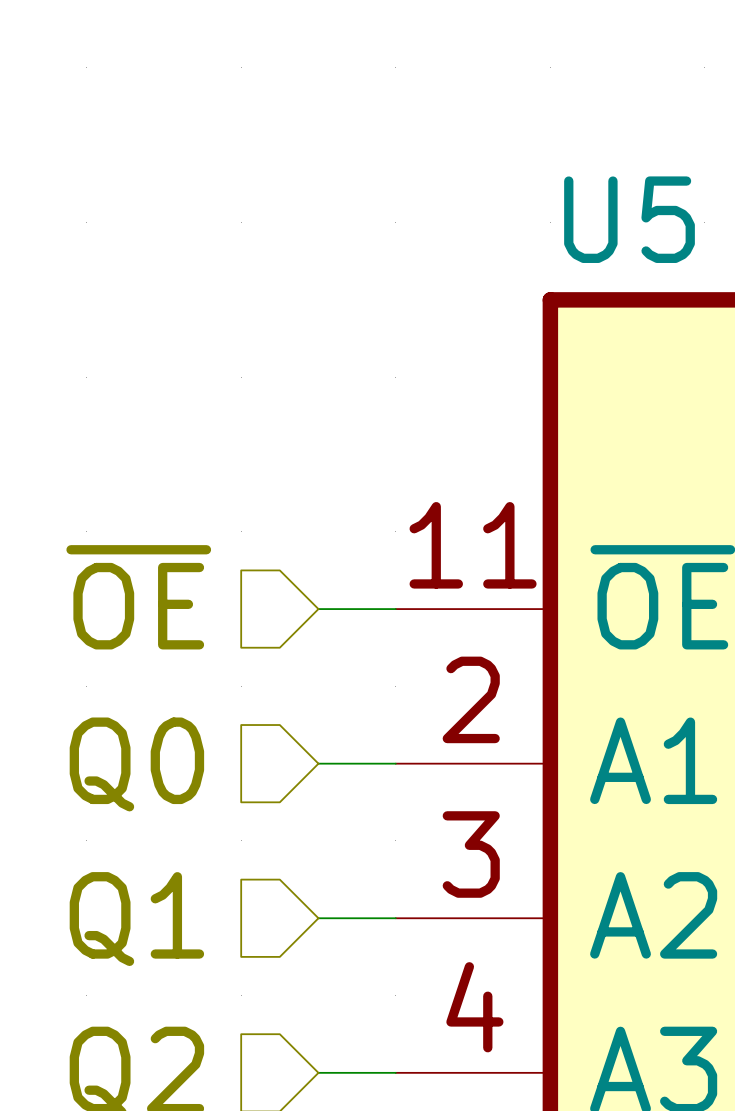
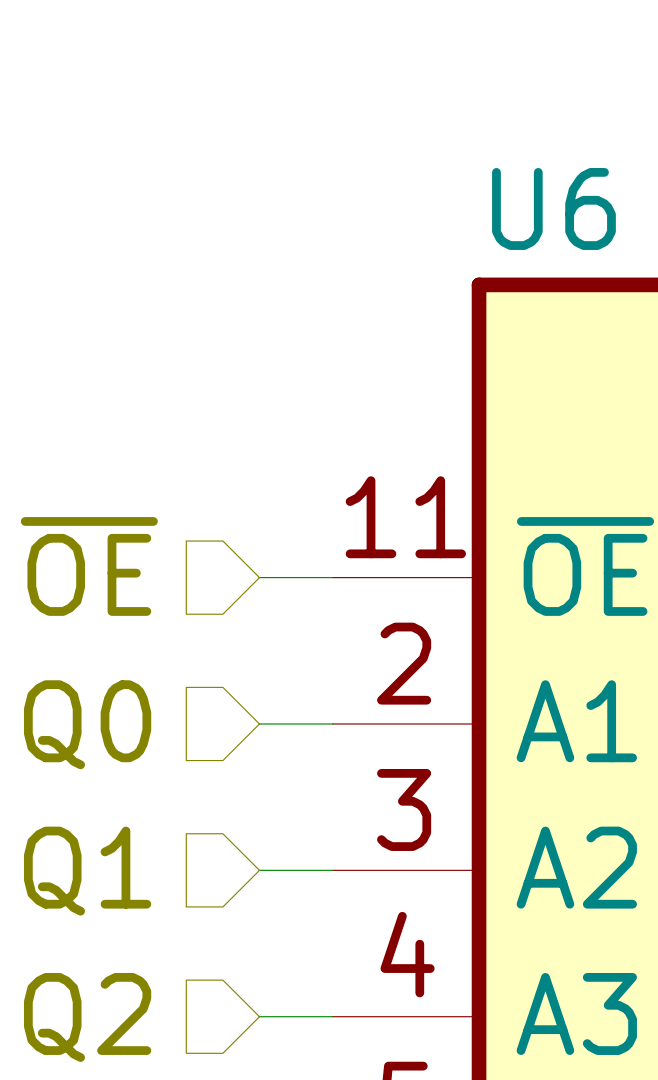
U5 name: U5 (629, 219) -> U6 (553, 208)

